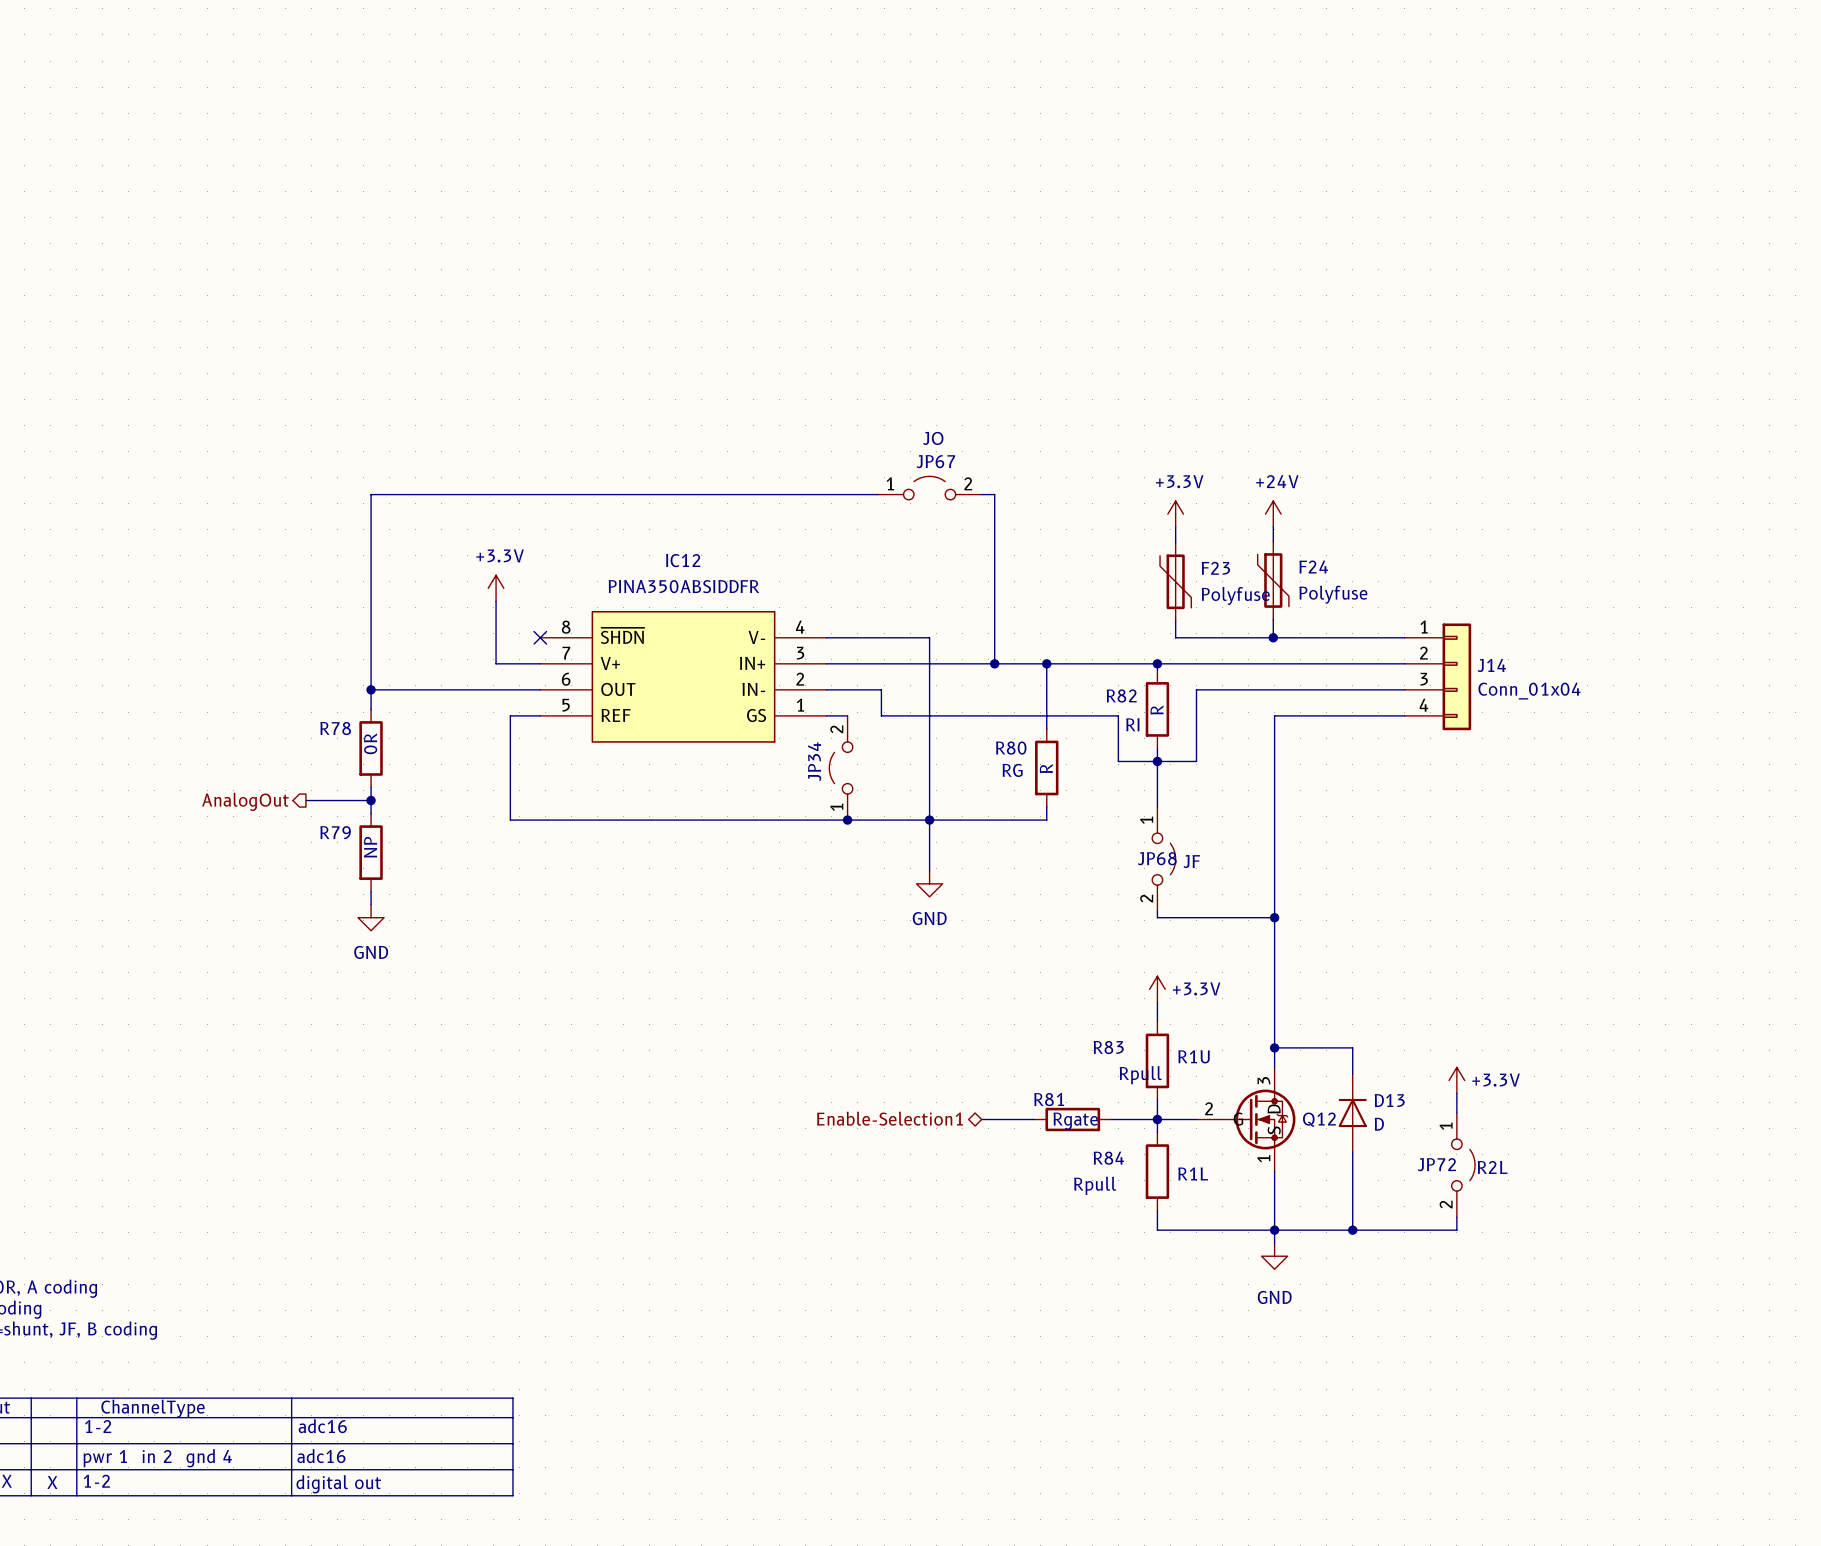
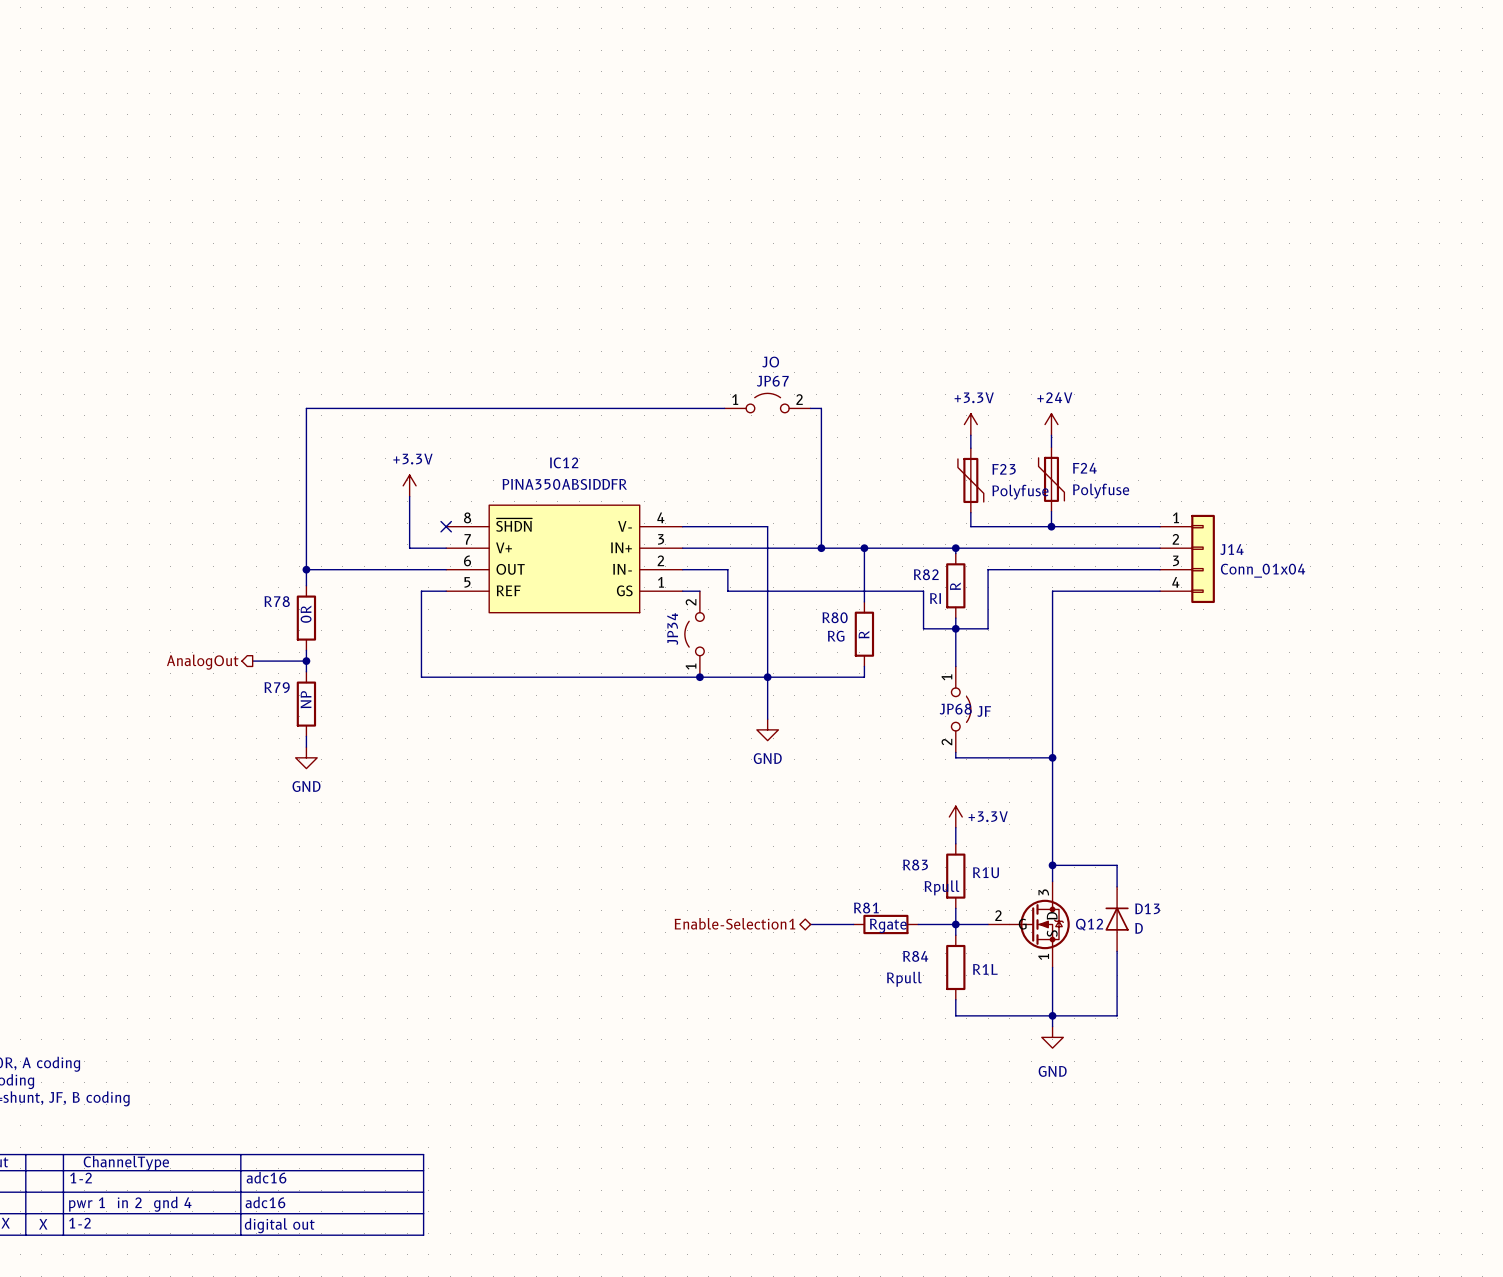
power symbol: +3.3V (1456, 1080) -> none
wire: (1456, 1093) (1456, 1113) -> none
JP72: (1463, 1165) -> none
text: R2L (1492, 1167) -> none
wire: (1456, 1217) (1456, 1230) (1352, 1230) -> none
junction: (1352, 1230) -> none

